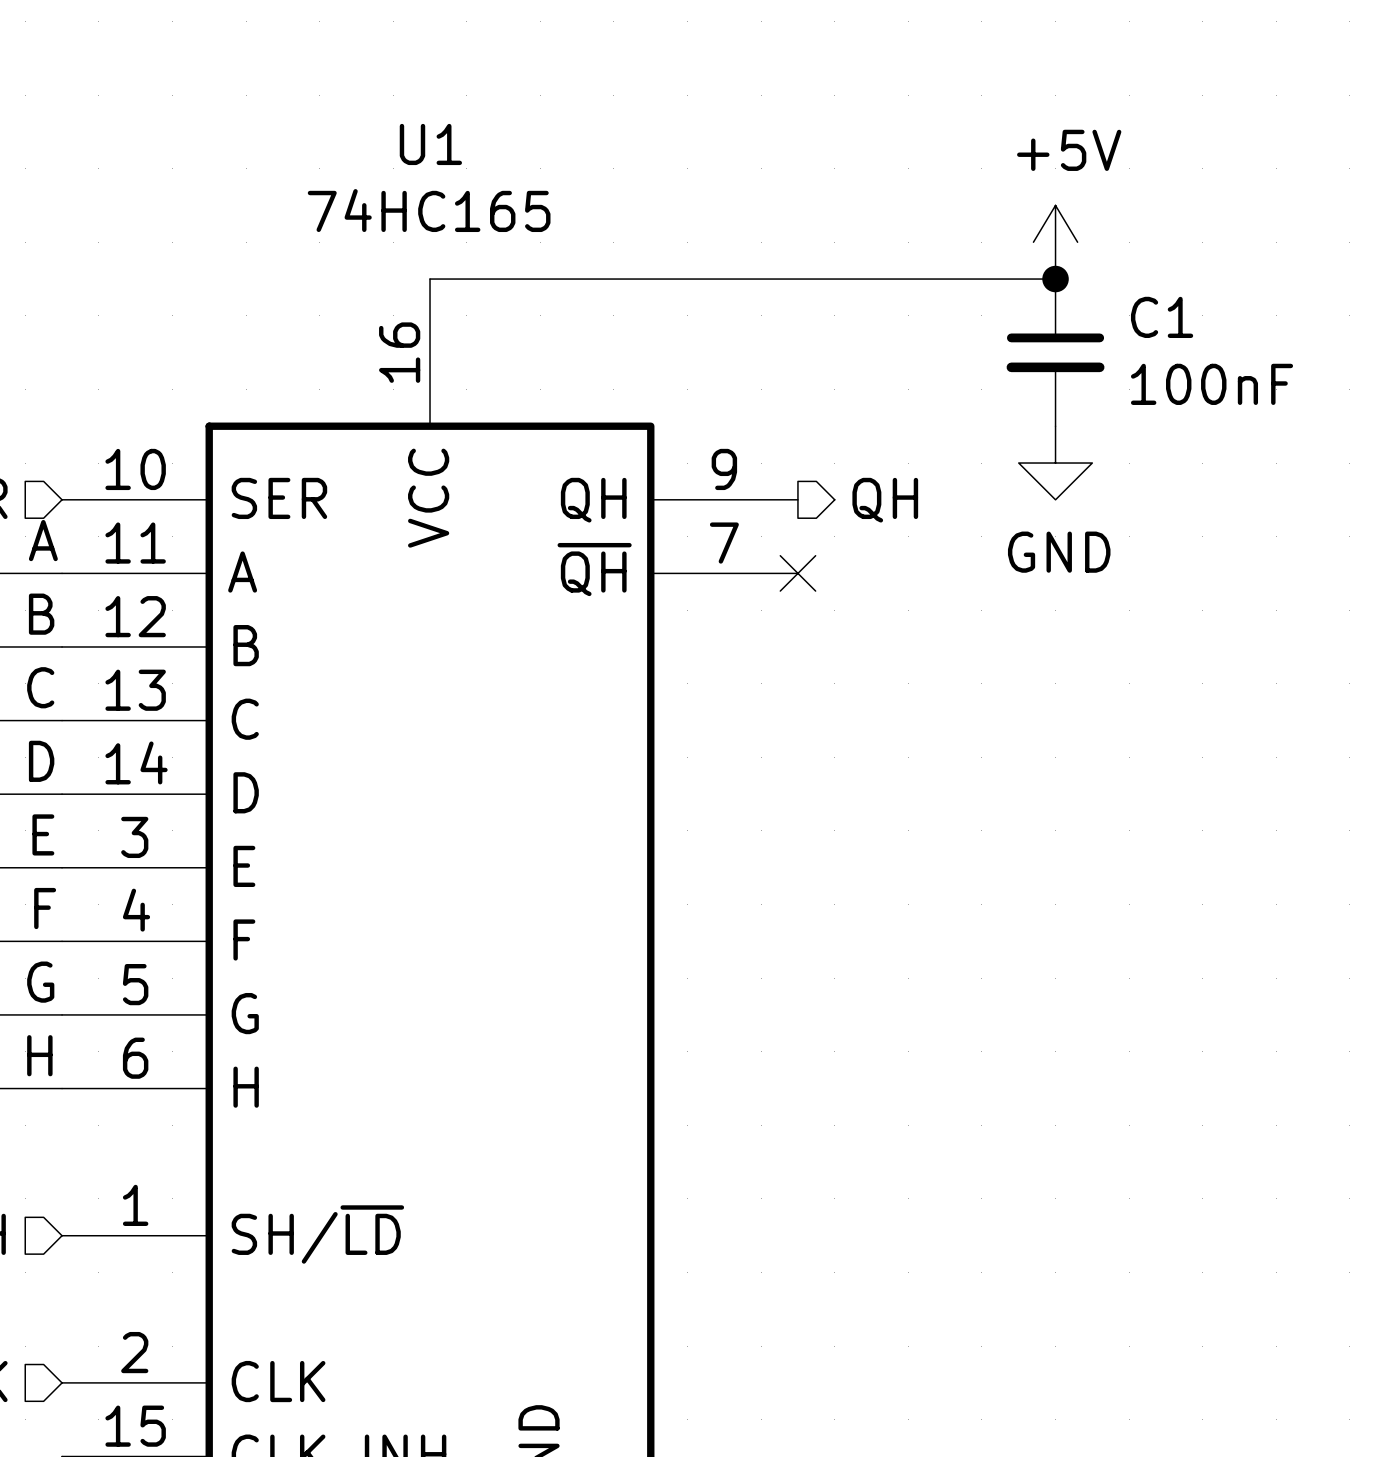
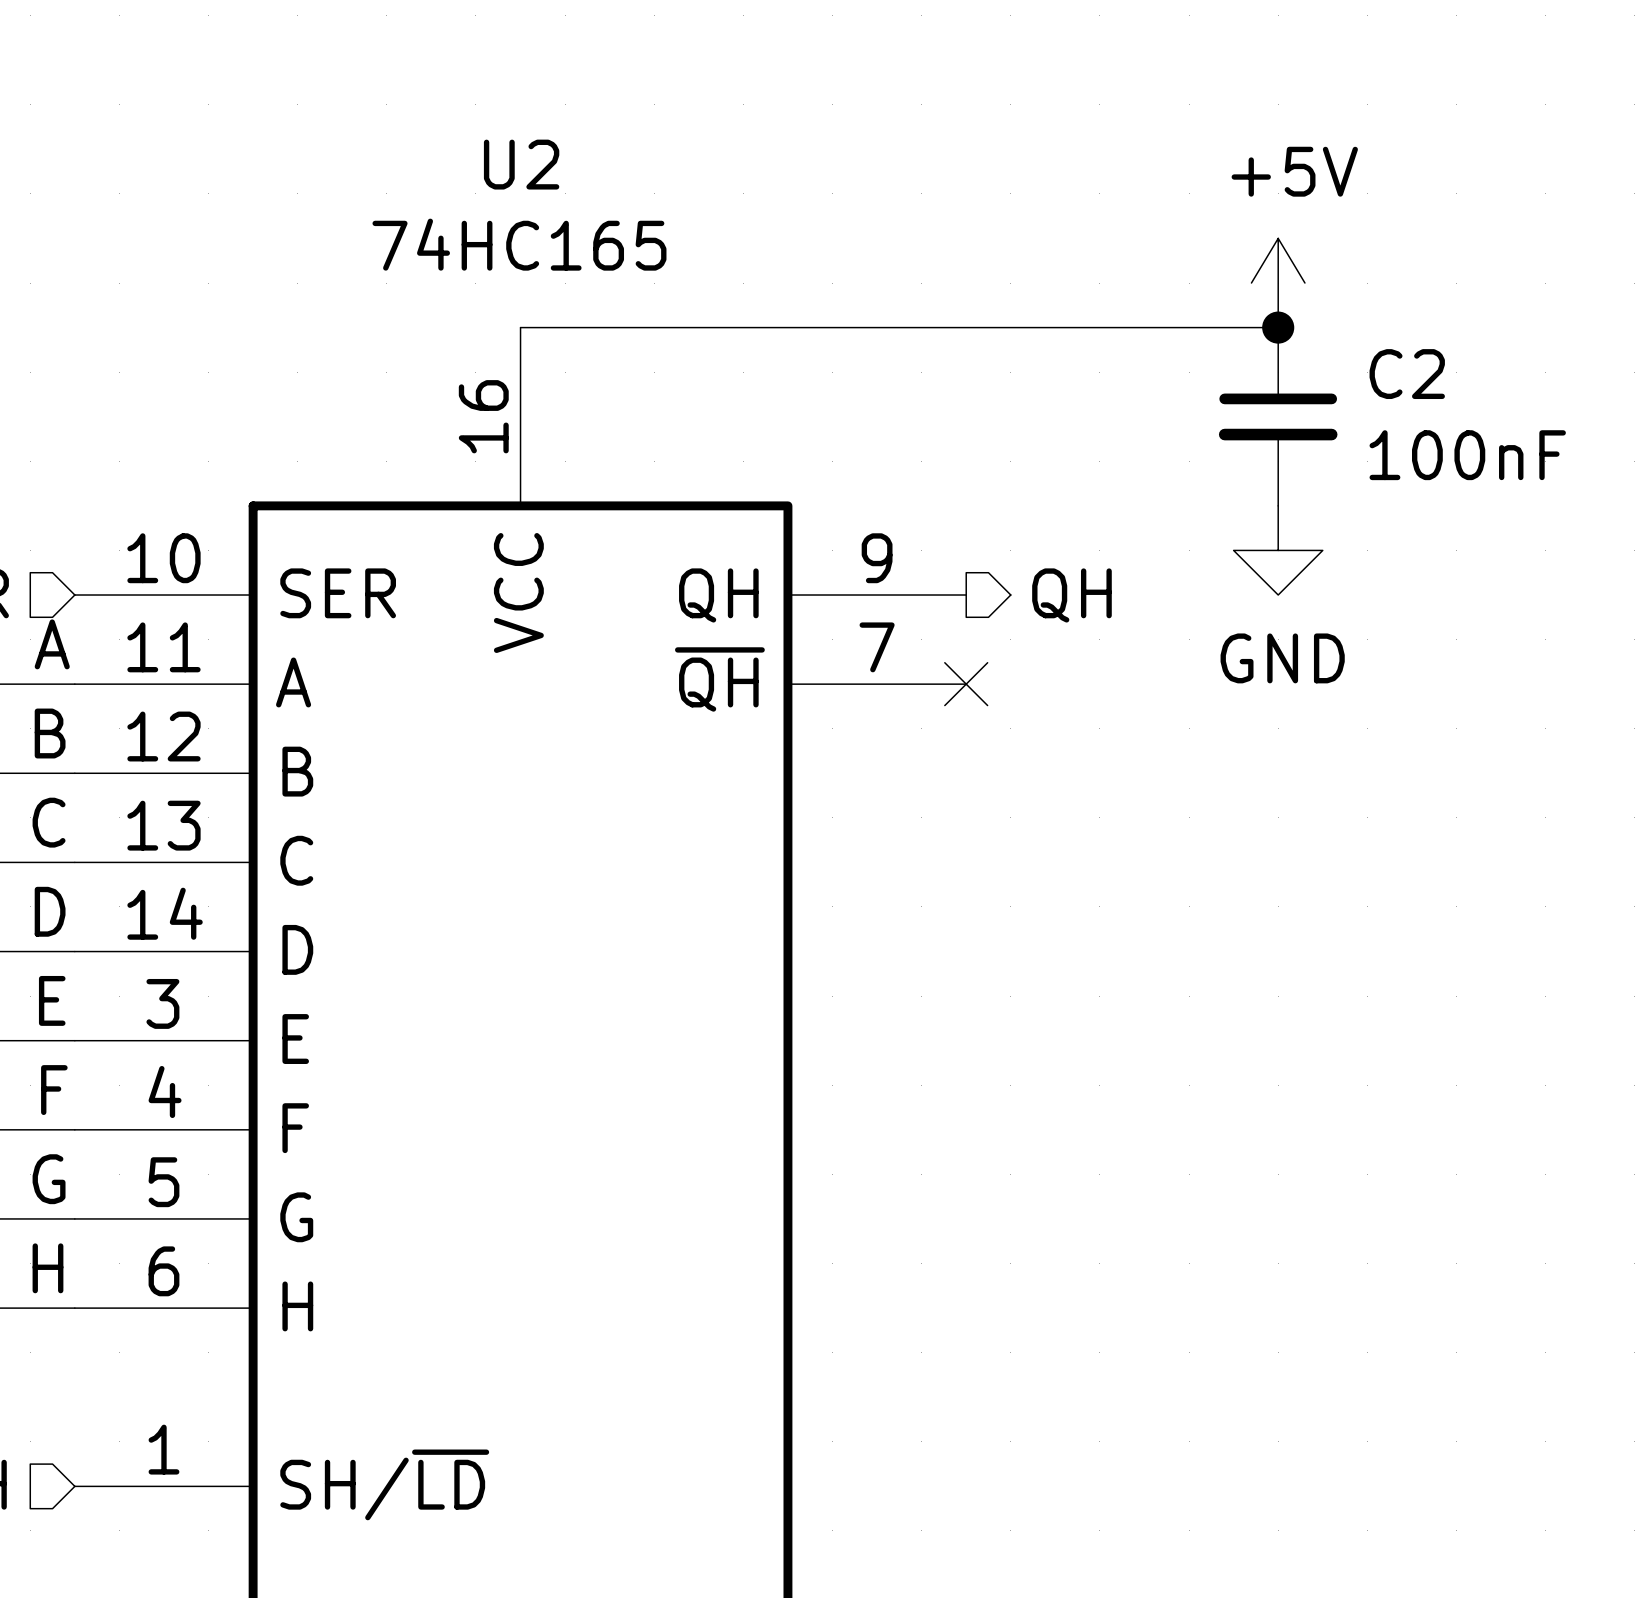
U1 name: U1 (430, 144) -> U2 (521, 164)
C1 name: C1 (1162, 317) -> C2 (1407, 374)

